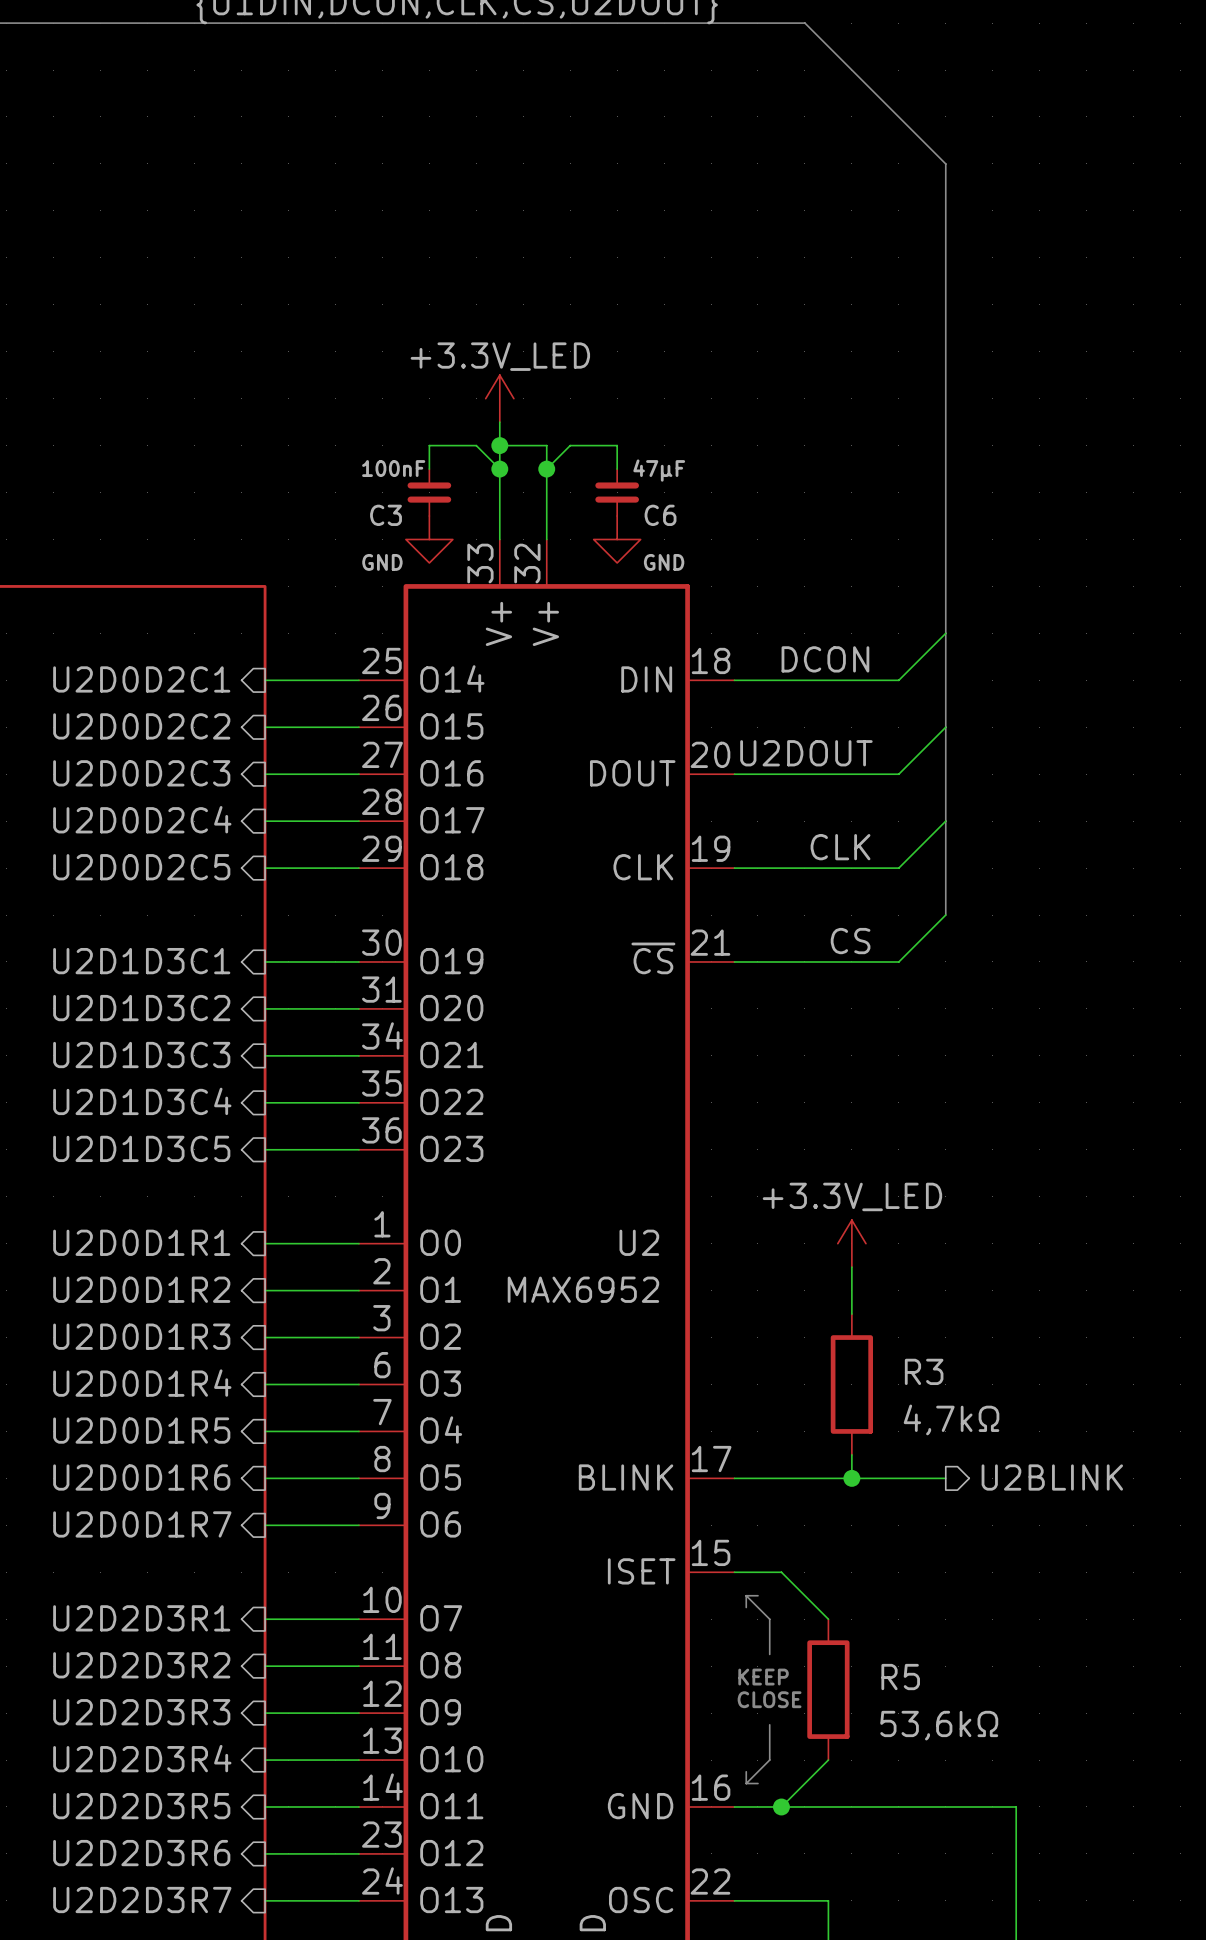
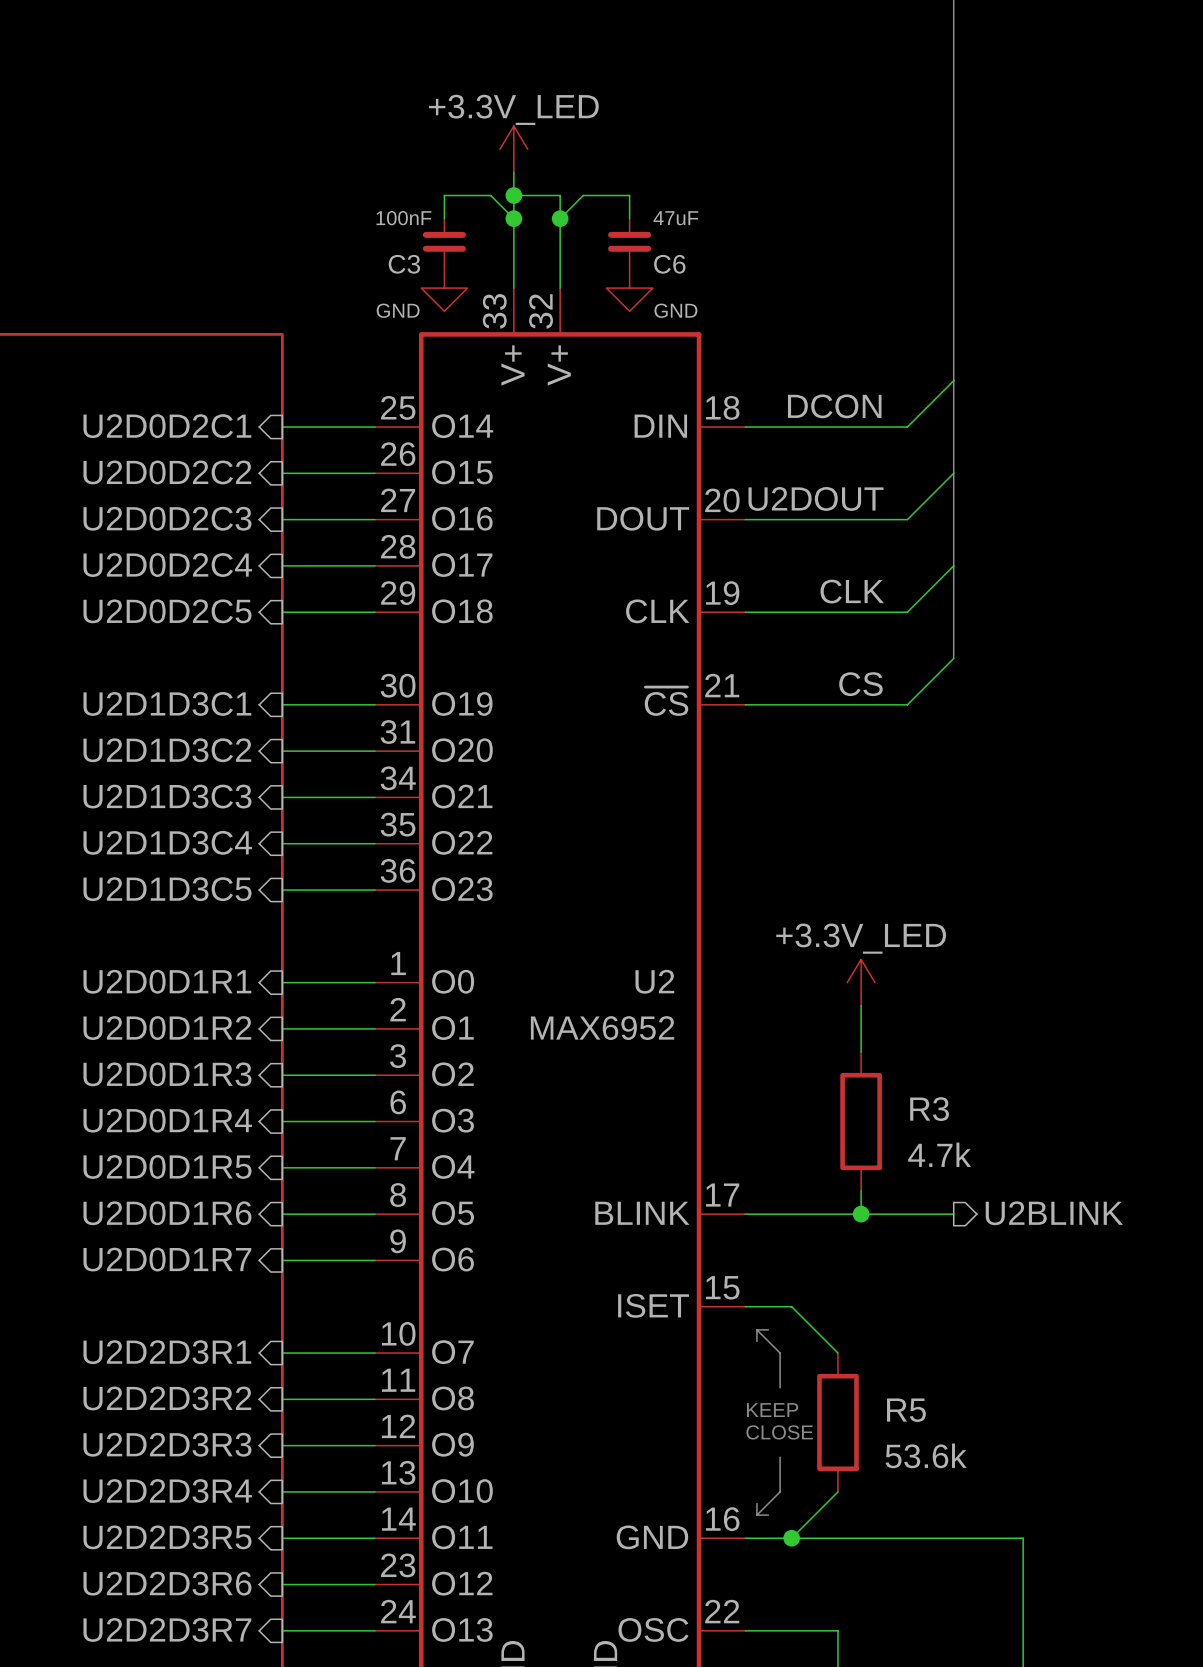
C6 value: 47µF (659, 470) -> 47uF (675, 218)
R3 value: 4,7kΩ (951, 1419) -> 4.7k (939, 1154)
R5 value: 53,6kΩ (939, 1725) -> 53.6k (926, 1455)

